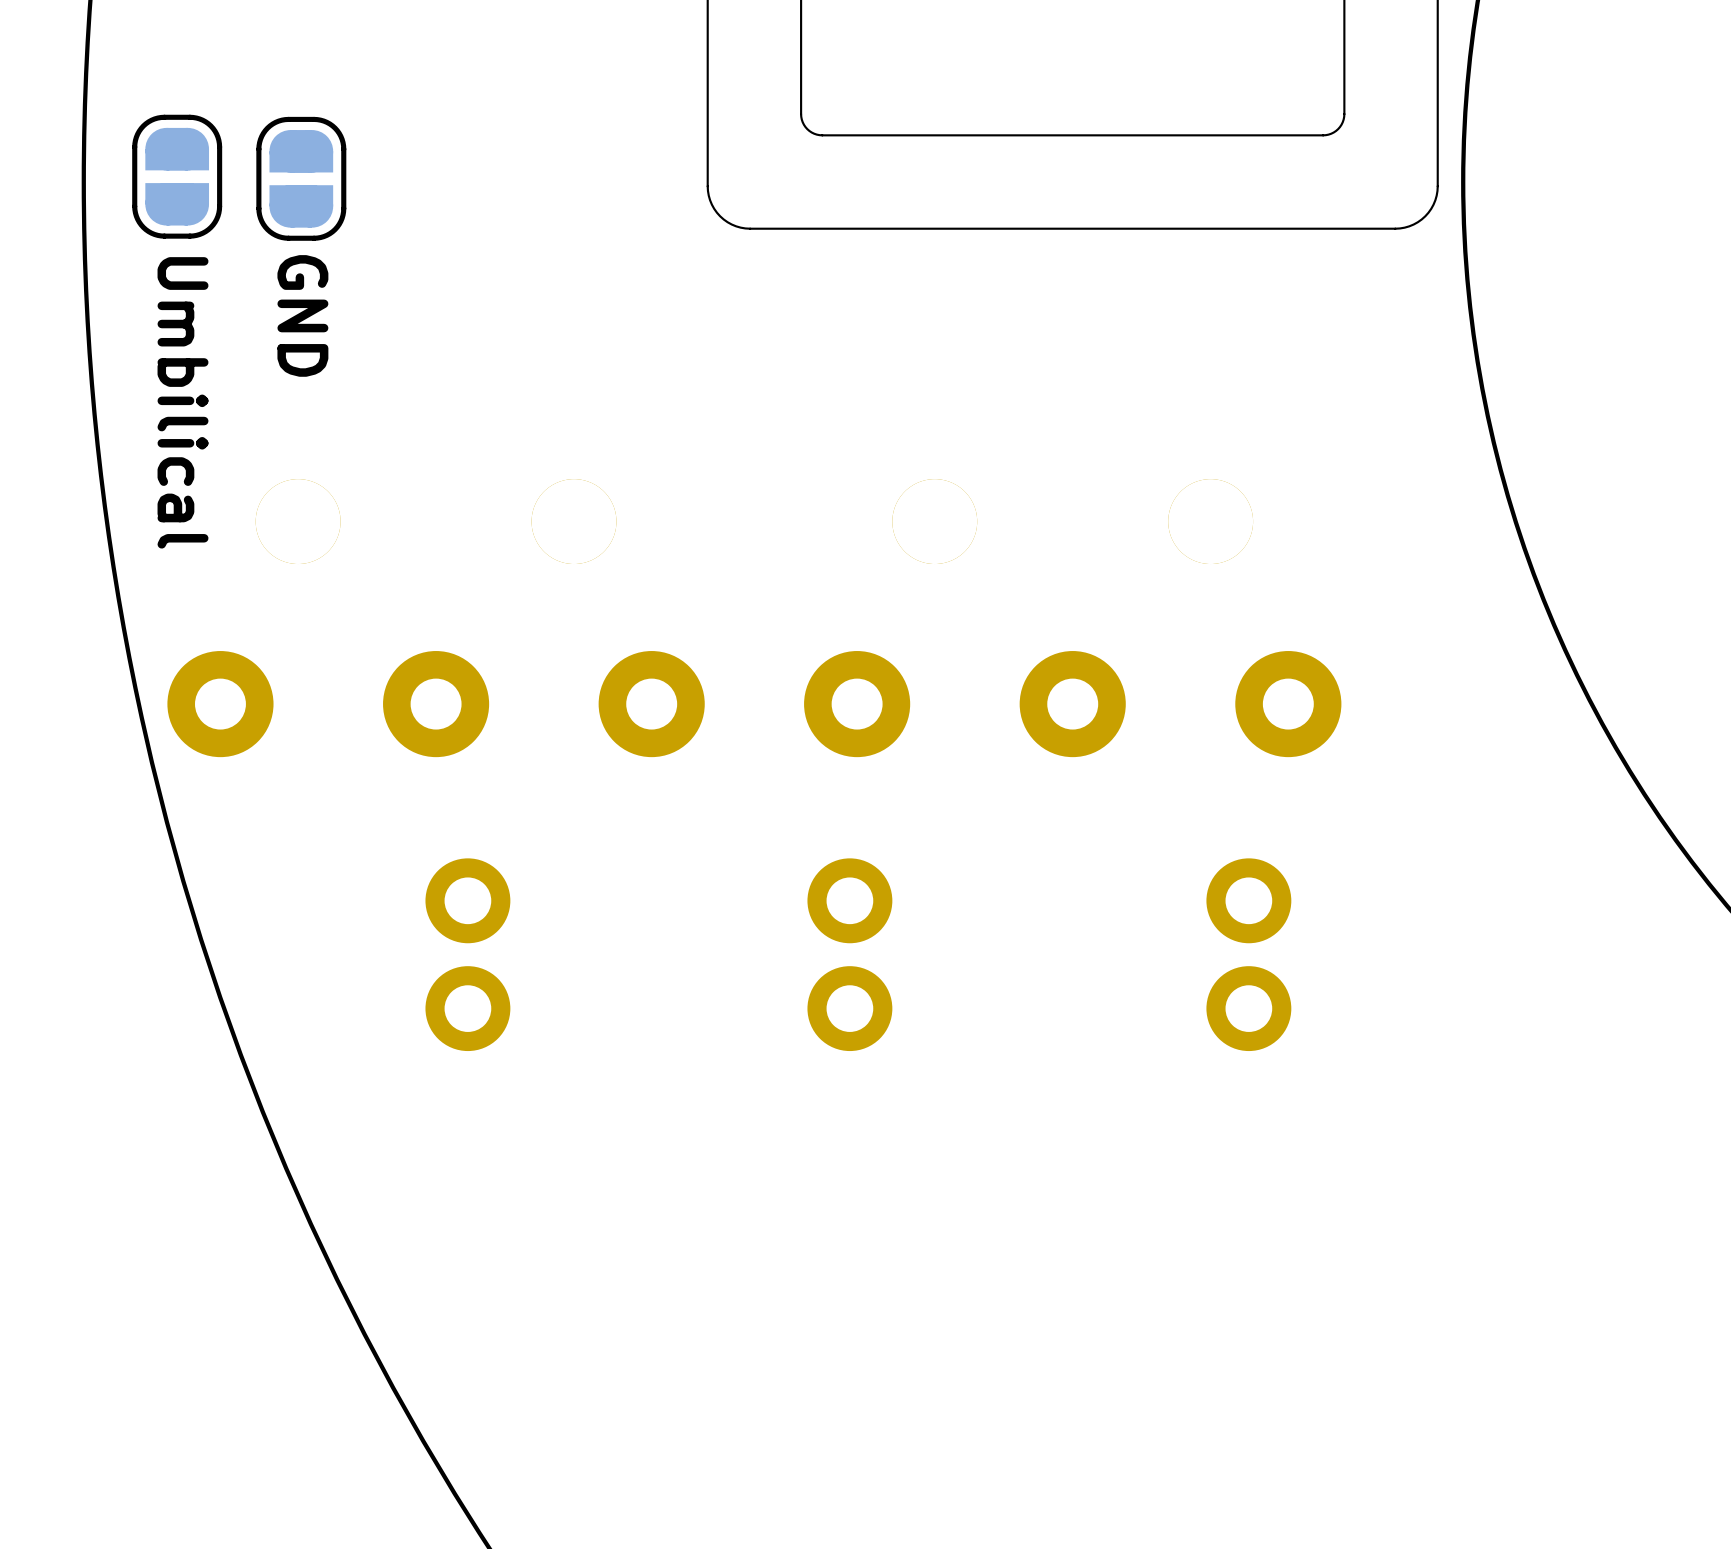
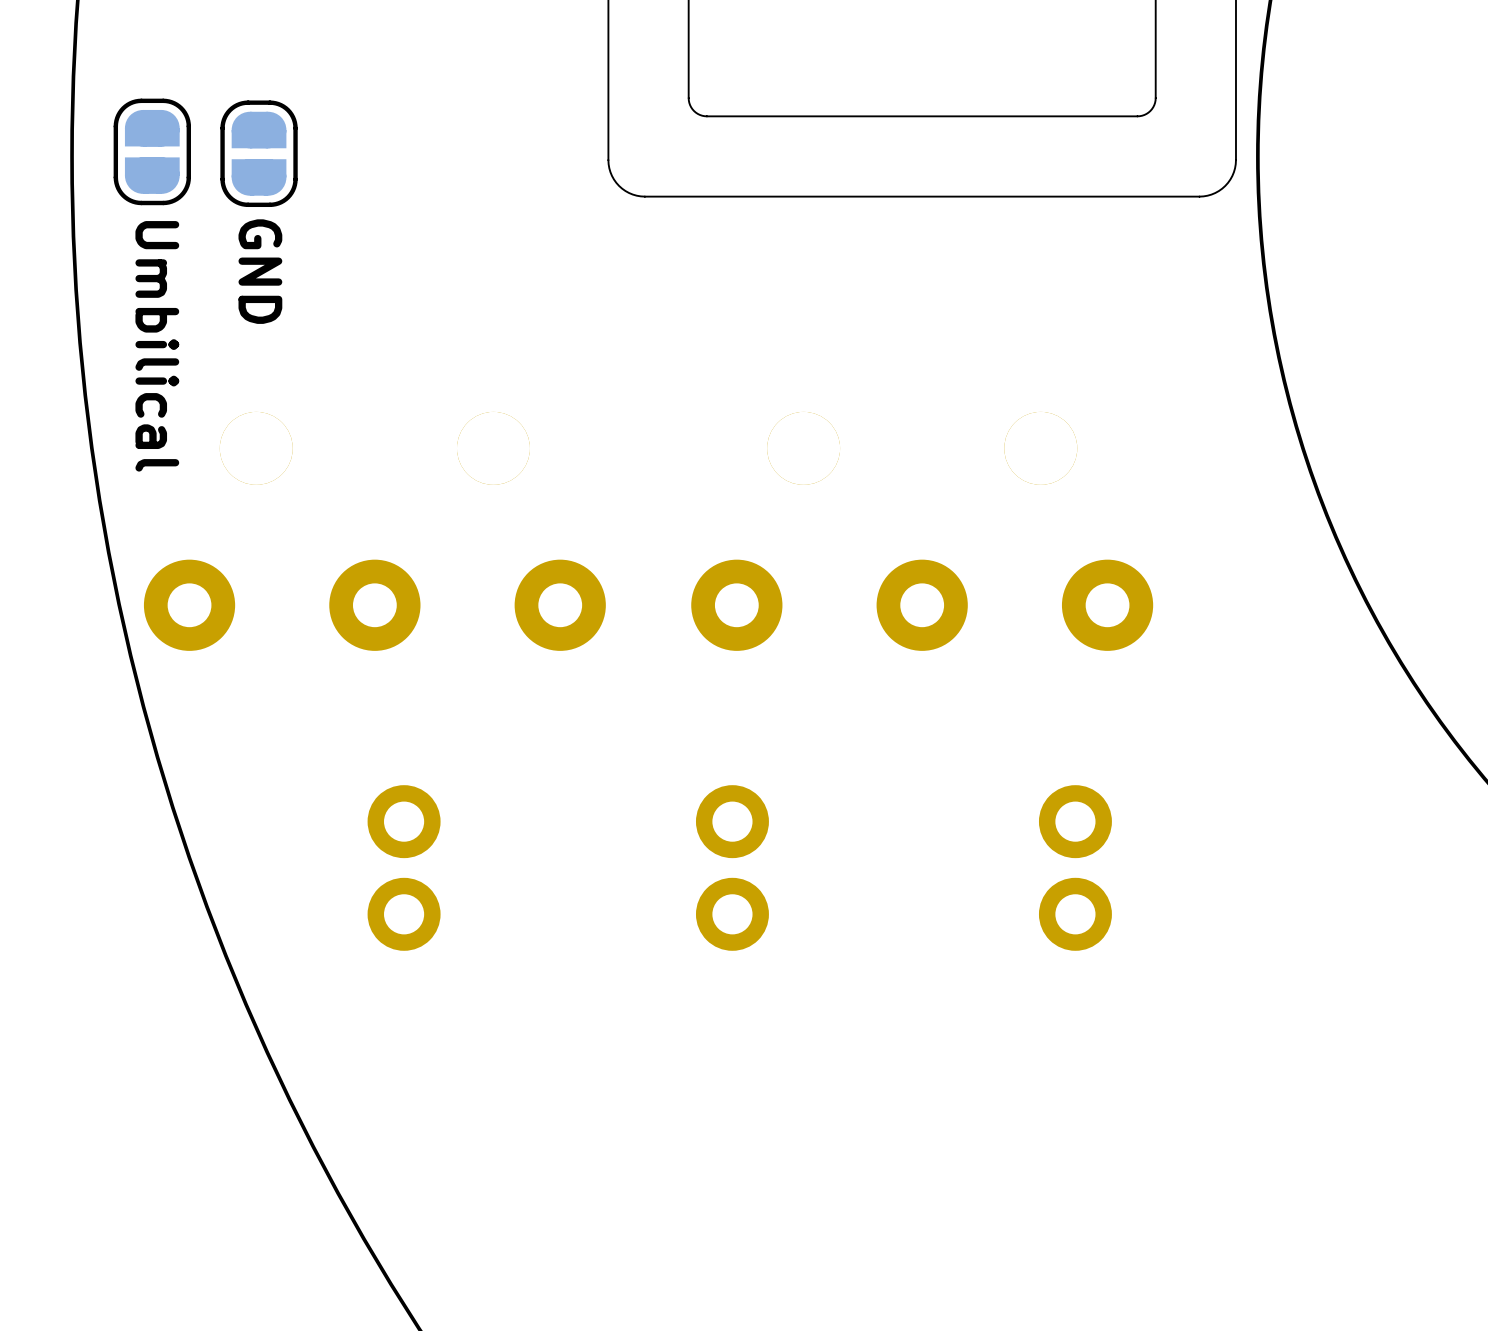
part position: (467, 954) -> (404, 867)
part position: (849, 954) -> (732, 867)
part position: (1248, 954) -> (1075, 867)

